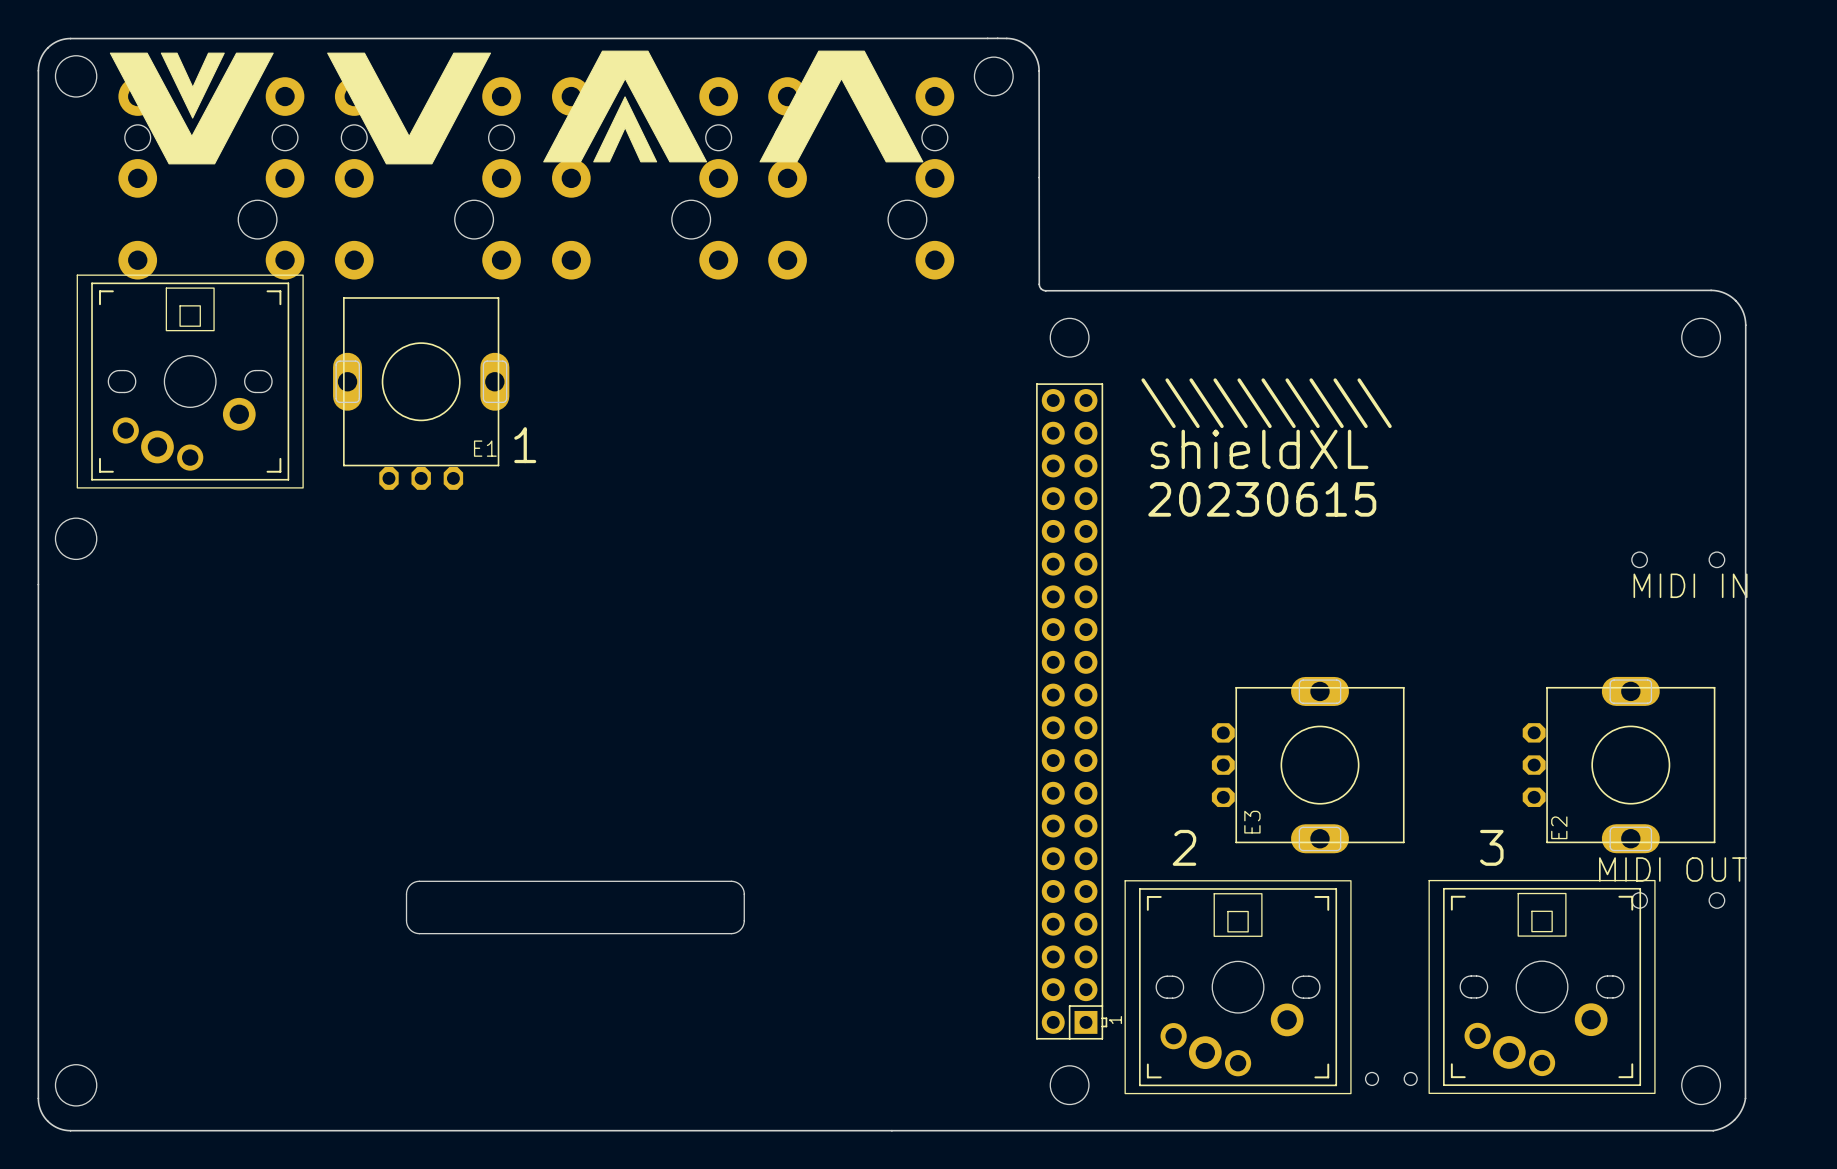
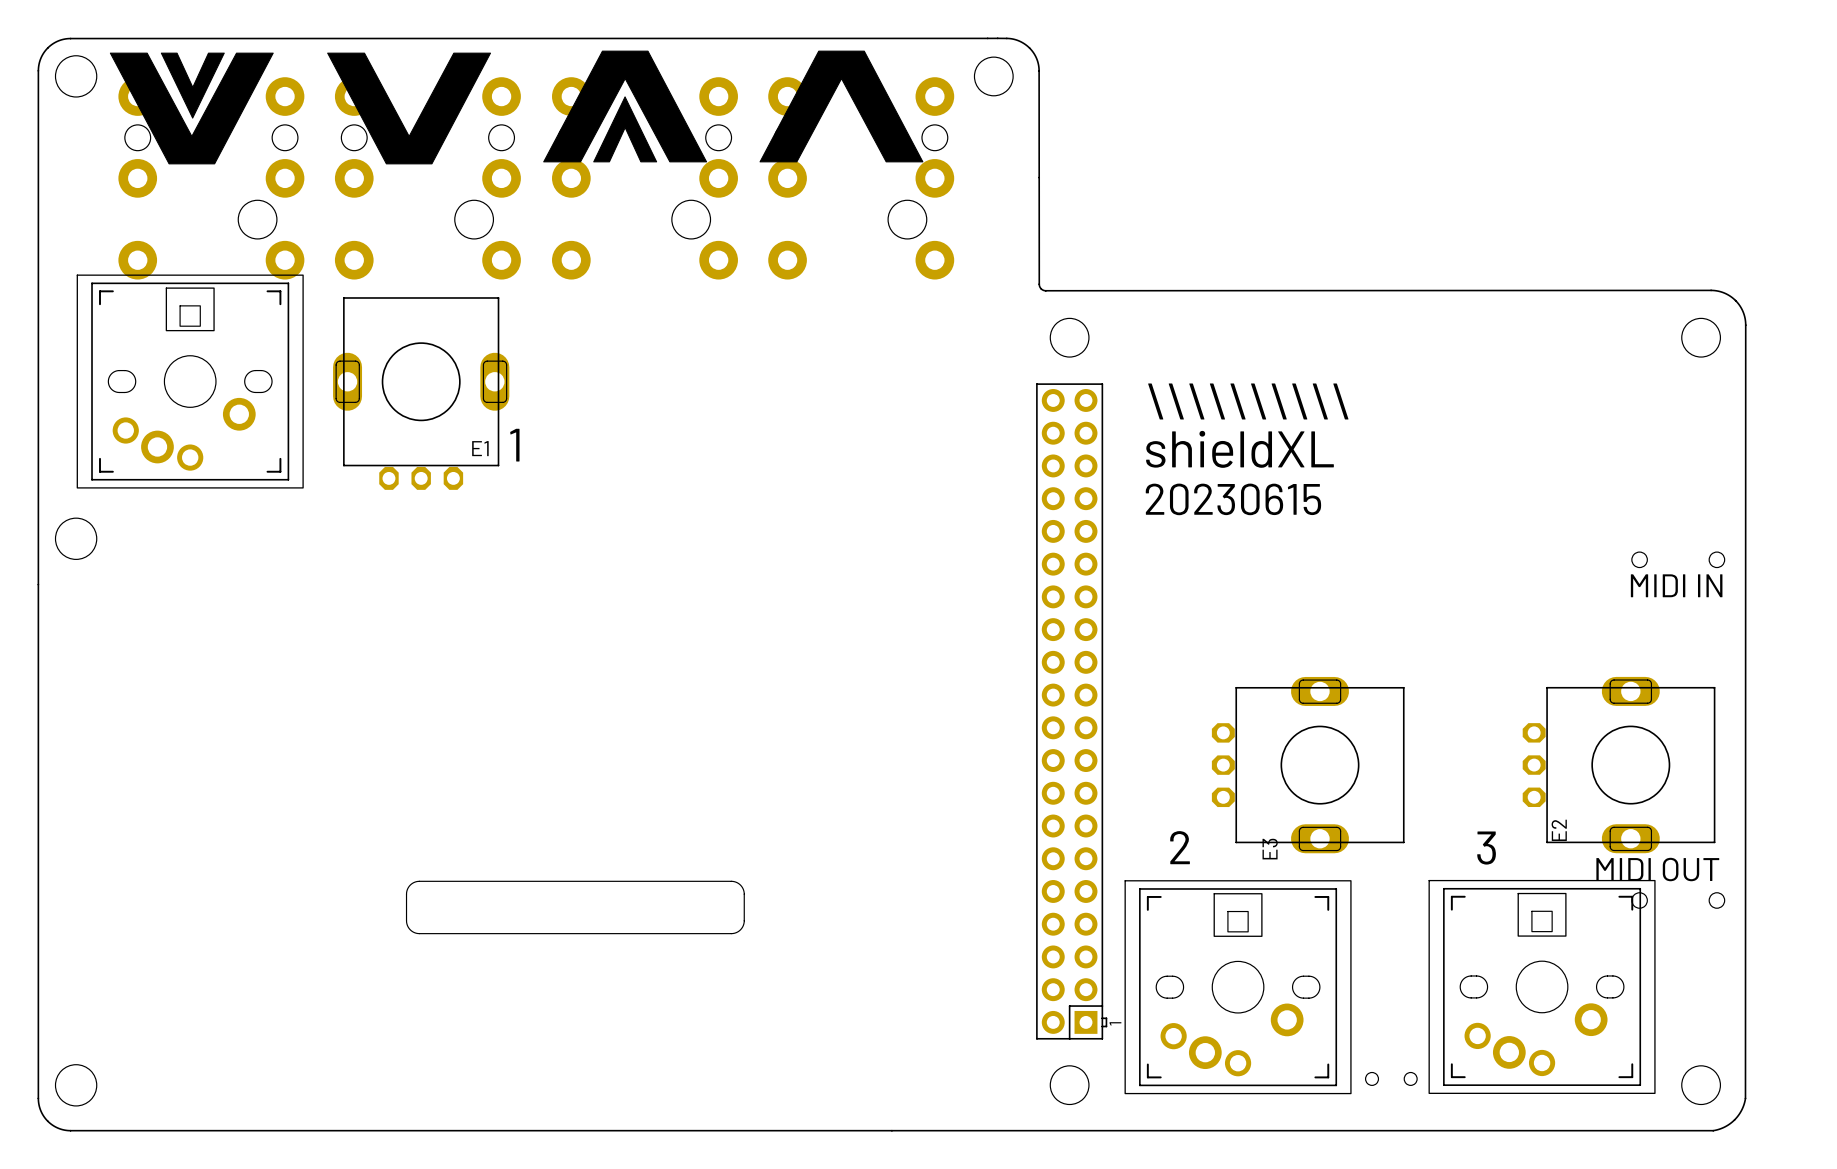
E3 name position: E3 (1252, 822) -> E3 (1270, 849)

